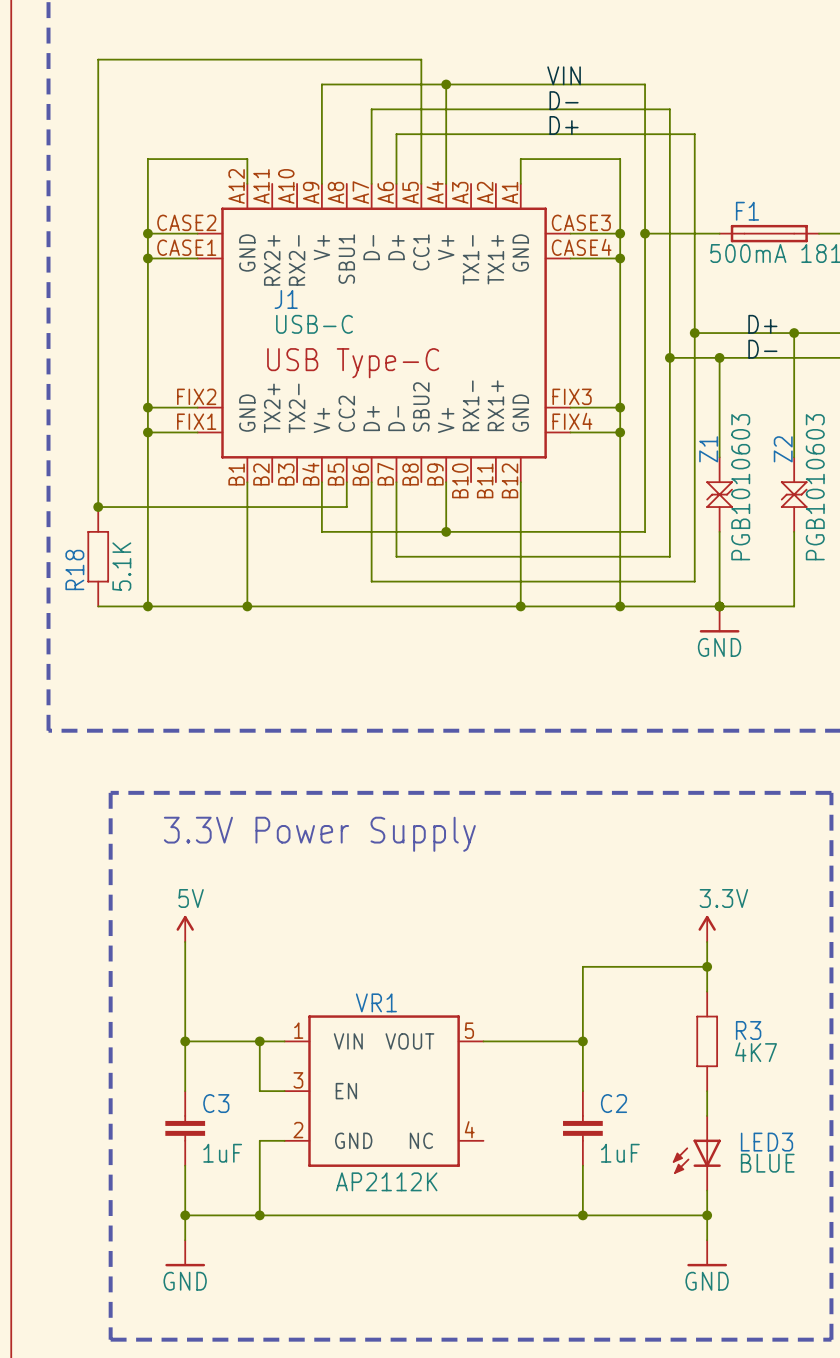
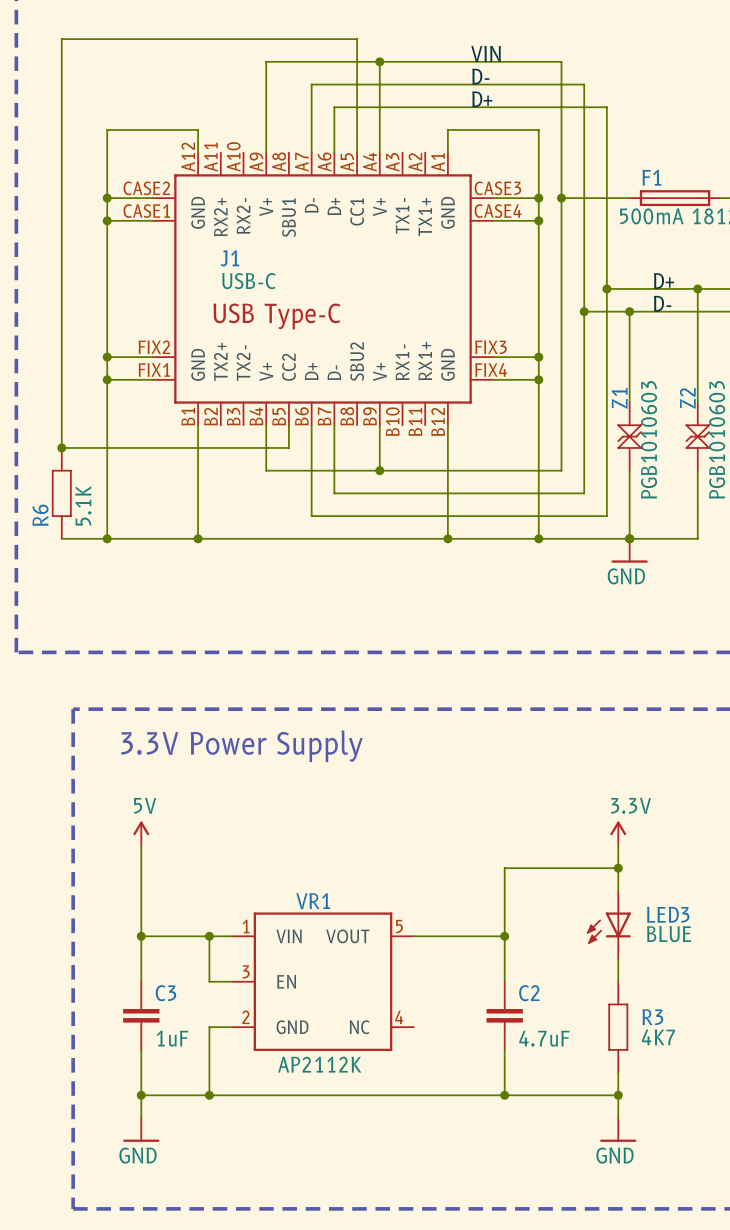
R18 name: R18 (74, 569) -> R6 (40, 515)
R3 position: (707, 1041) -> (618, 1027)
C2 value: 1uF (620, 1153) -> 4.7uF (544, 1038)
LED3 position: (696, 1153) -> (608, 924)

